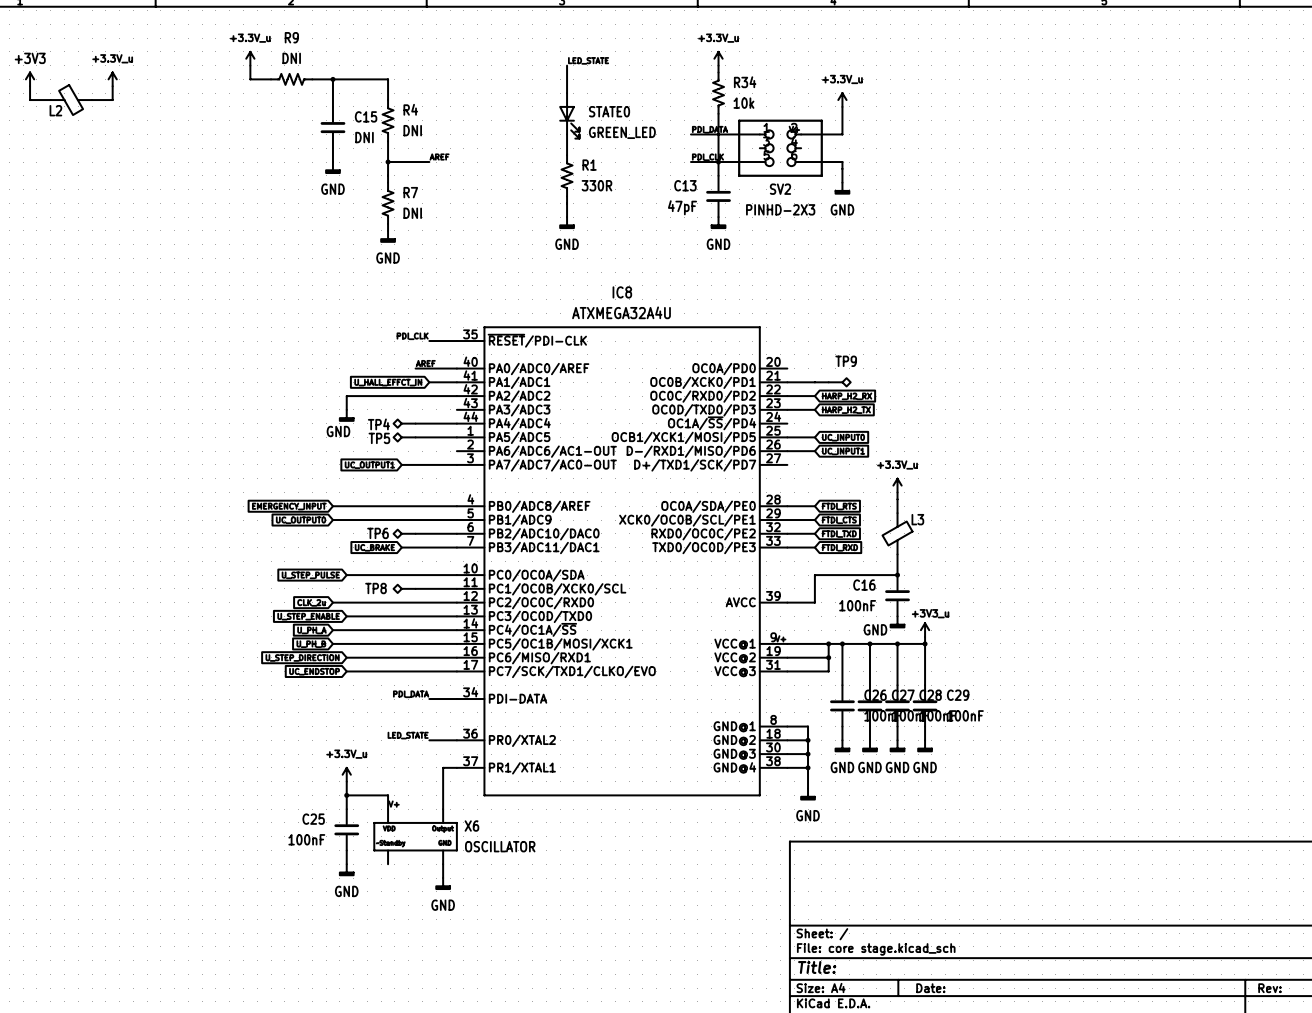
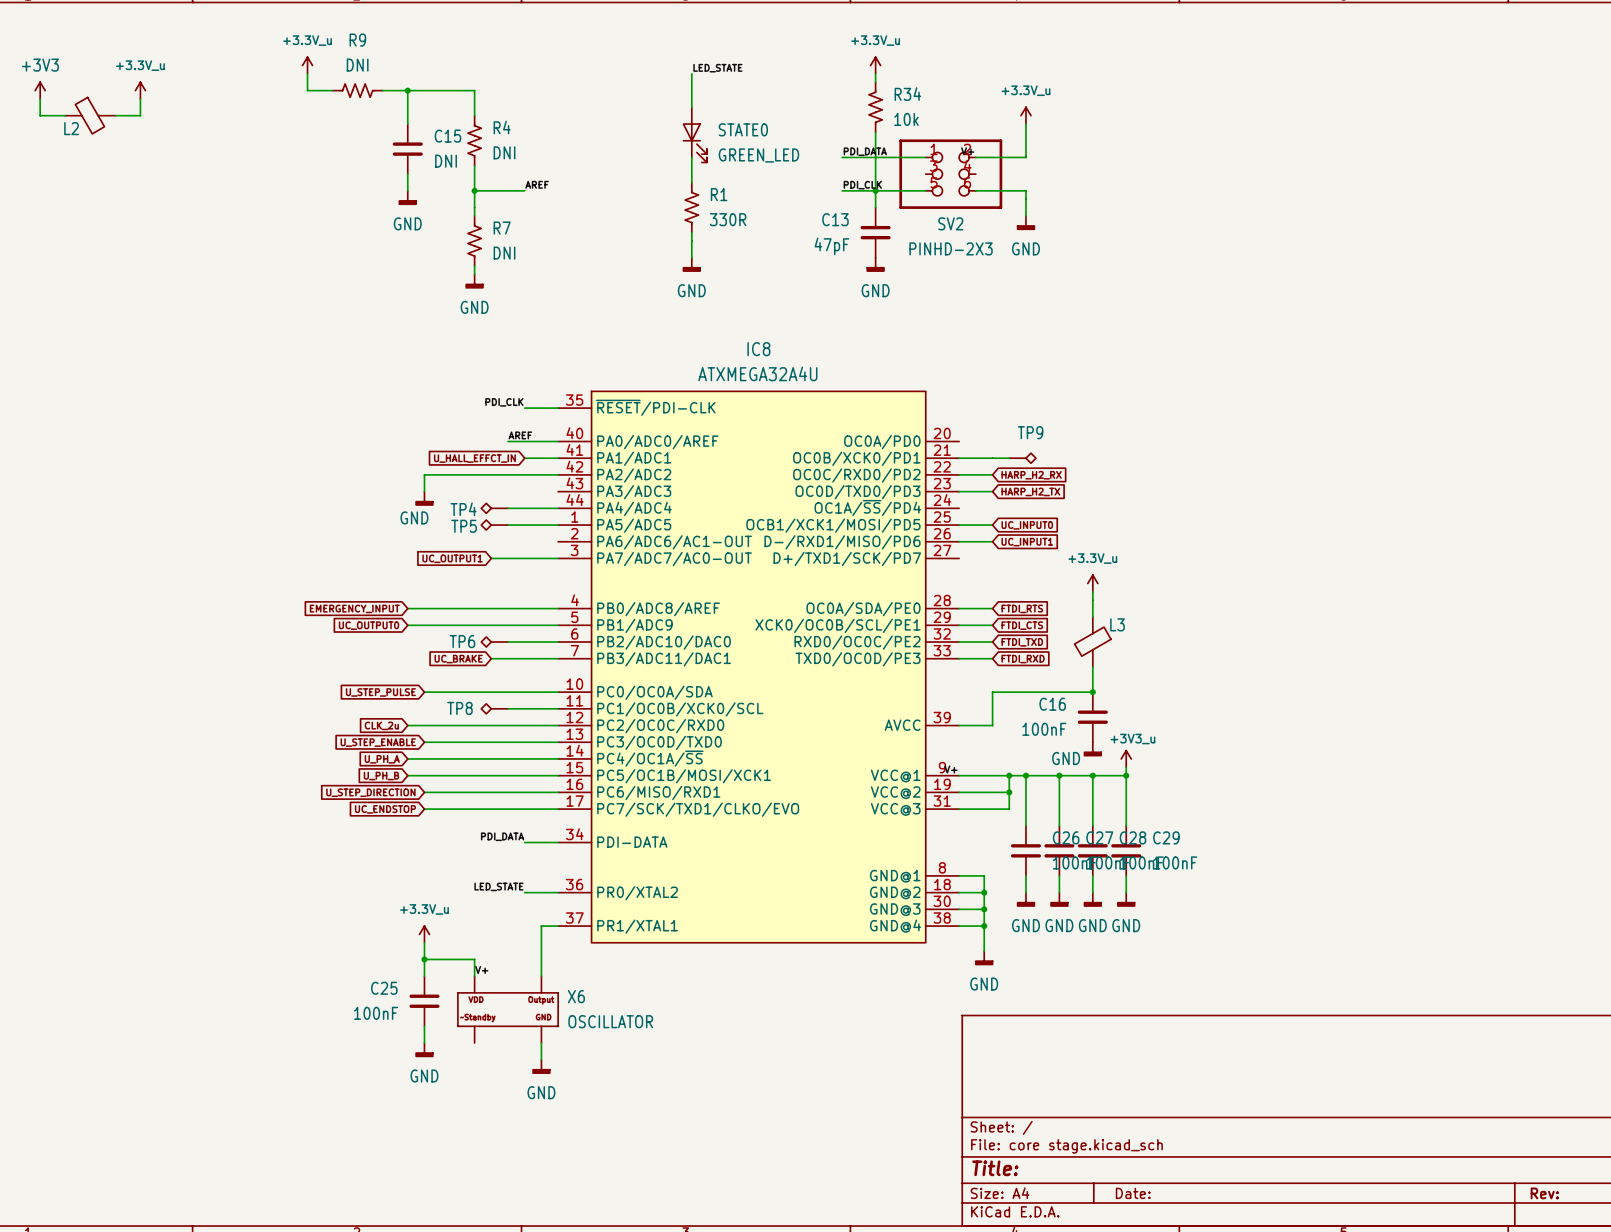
IC8 symbol: [456, 326, 788, 797] -> [558, 391, 960, 943]

